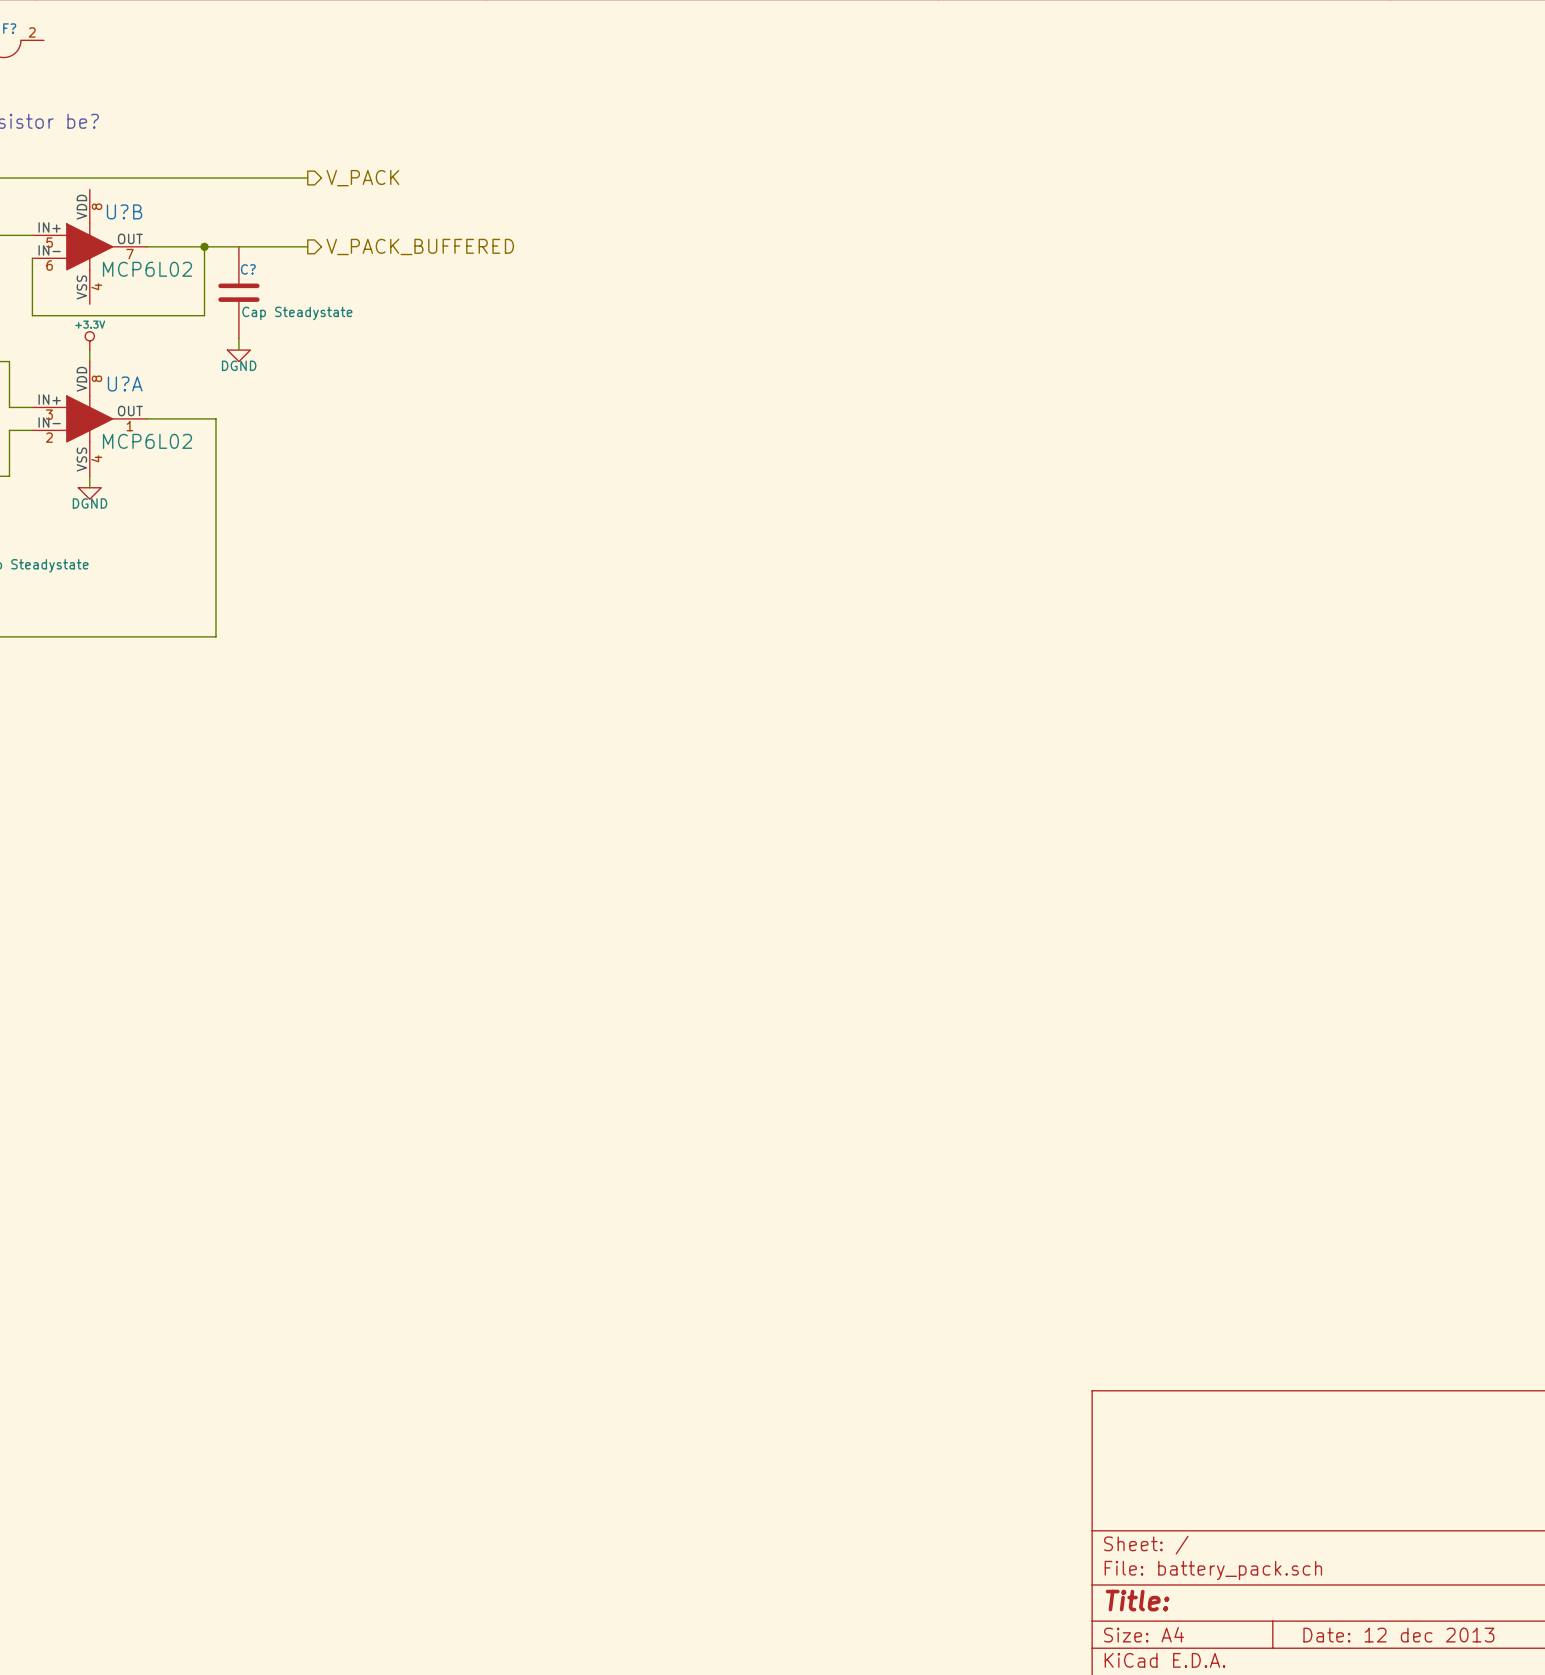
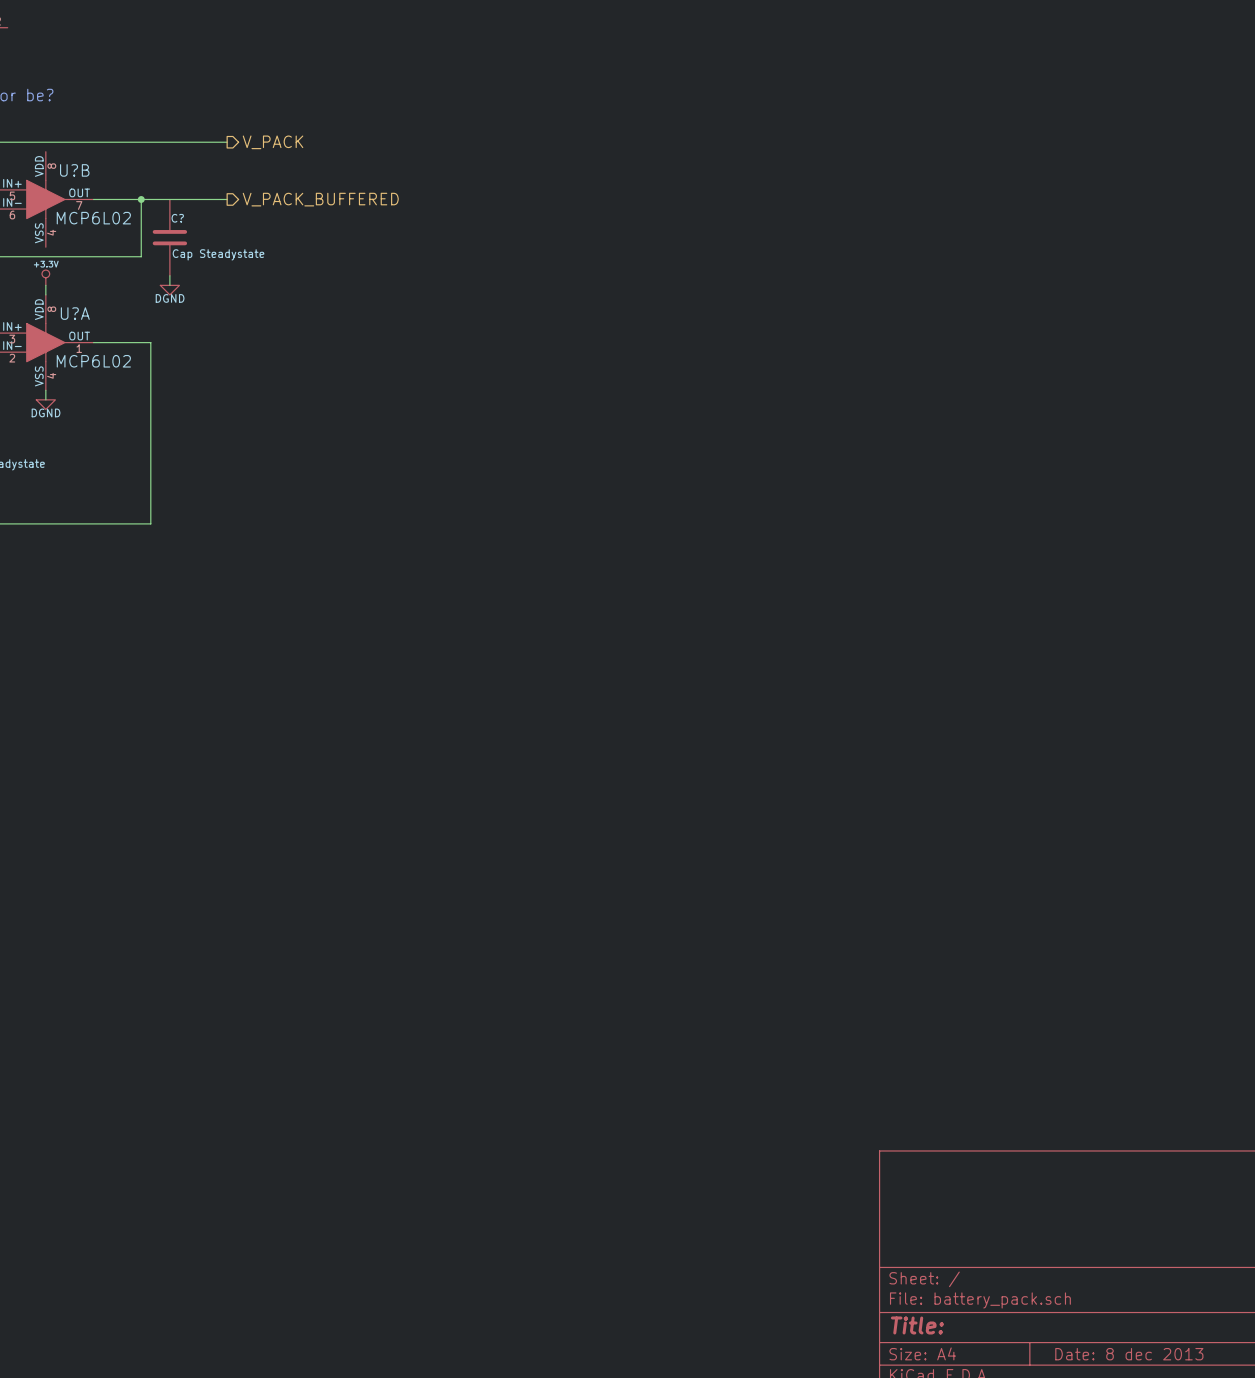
title block: Date: 12 dec 2013 (1398, 1635) -> Date: 8 dec 2013 (1129, 1354)

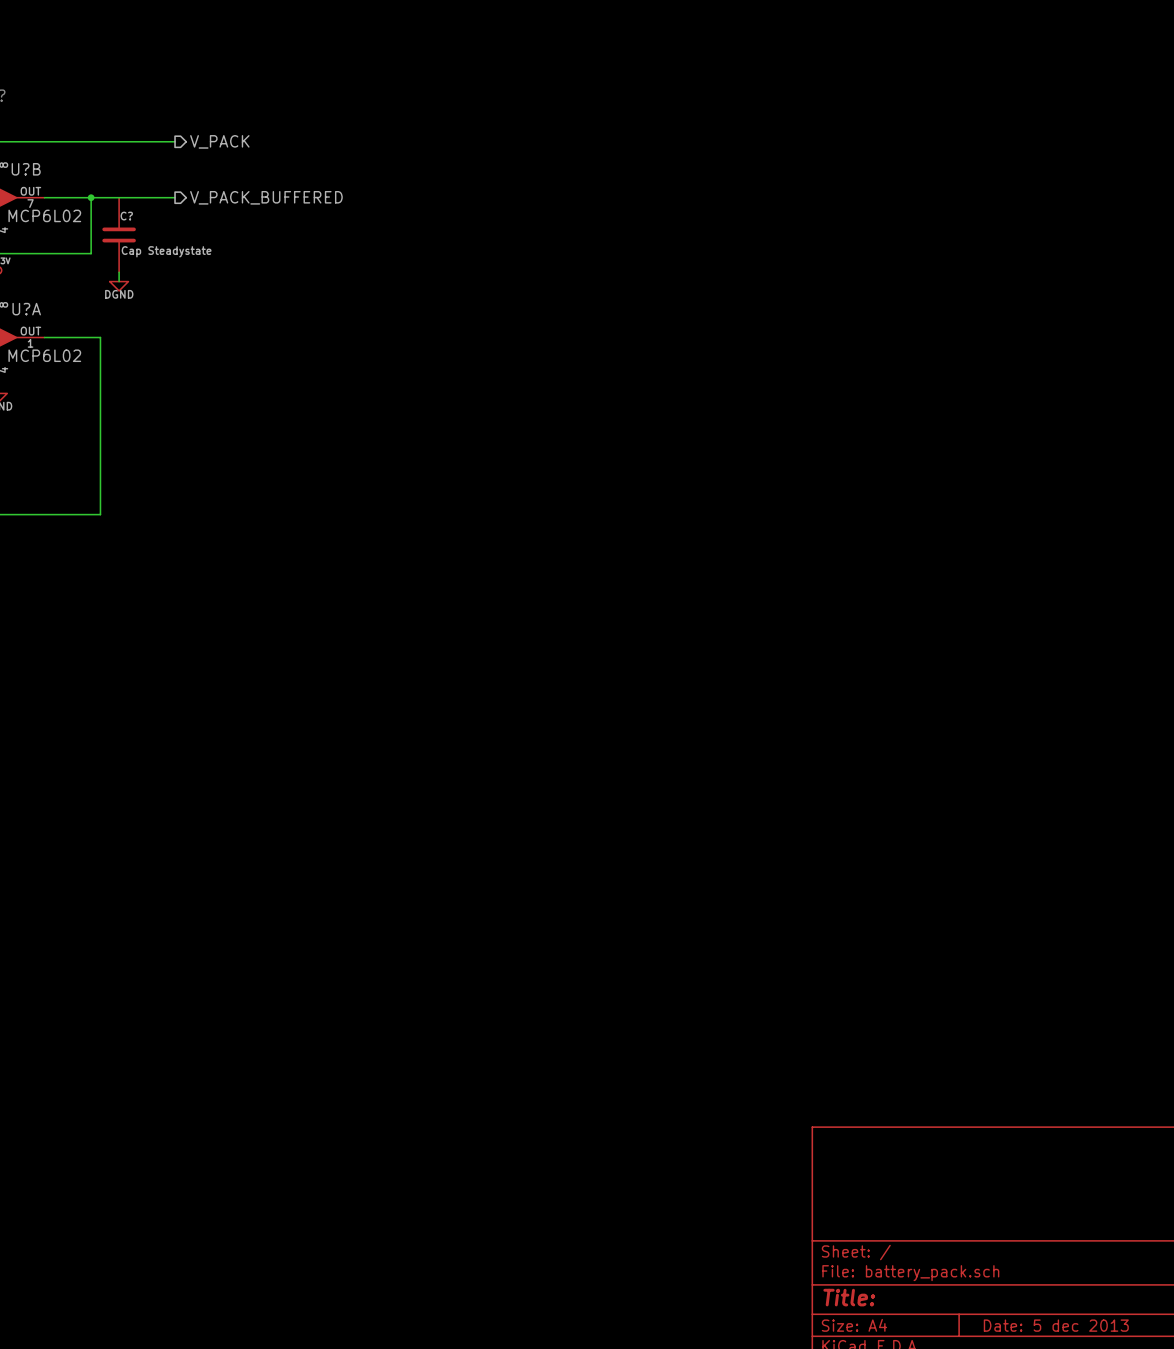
title block: Date: 8 dec 2013 (1129, 1354) -> Date: 5 dec 2013 (1056, 1325)

